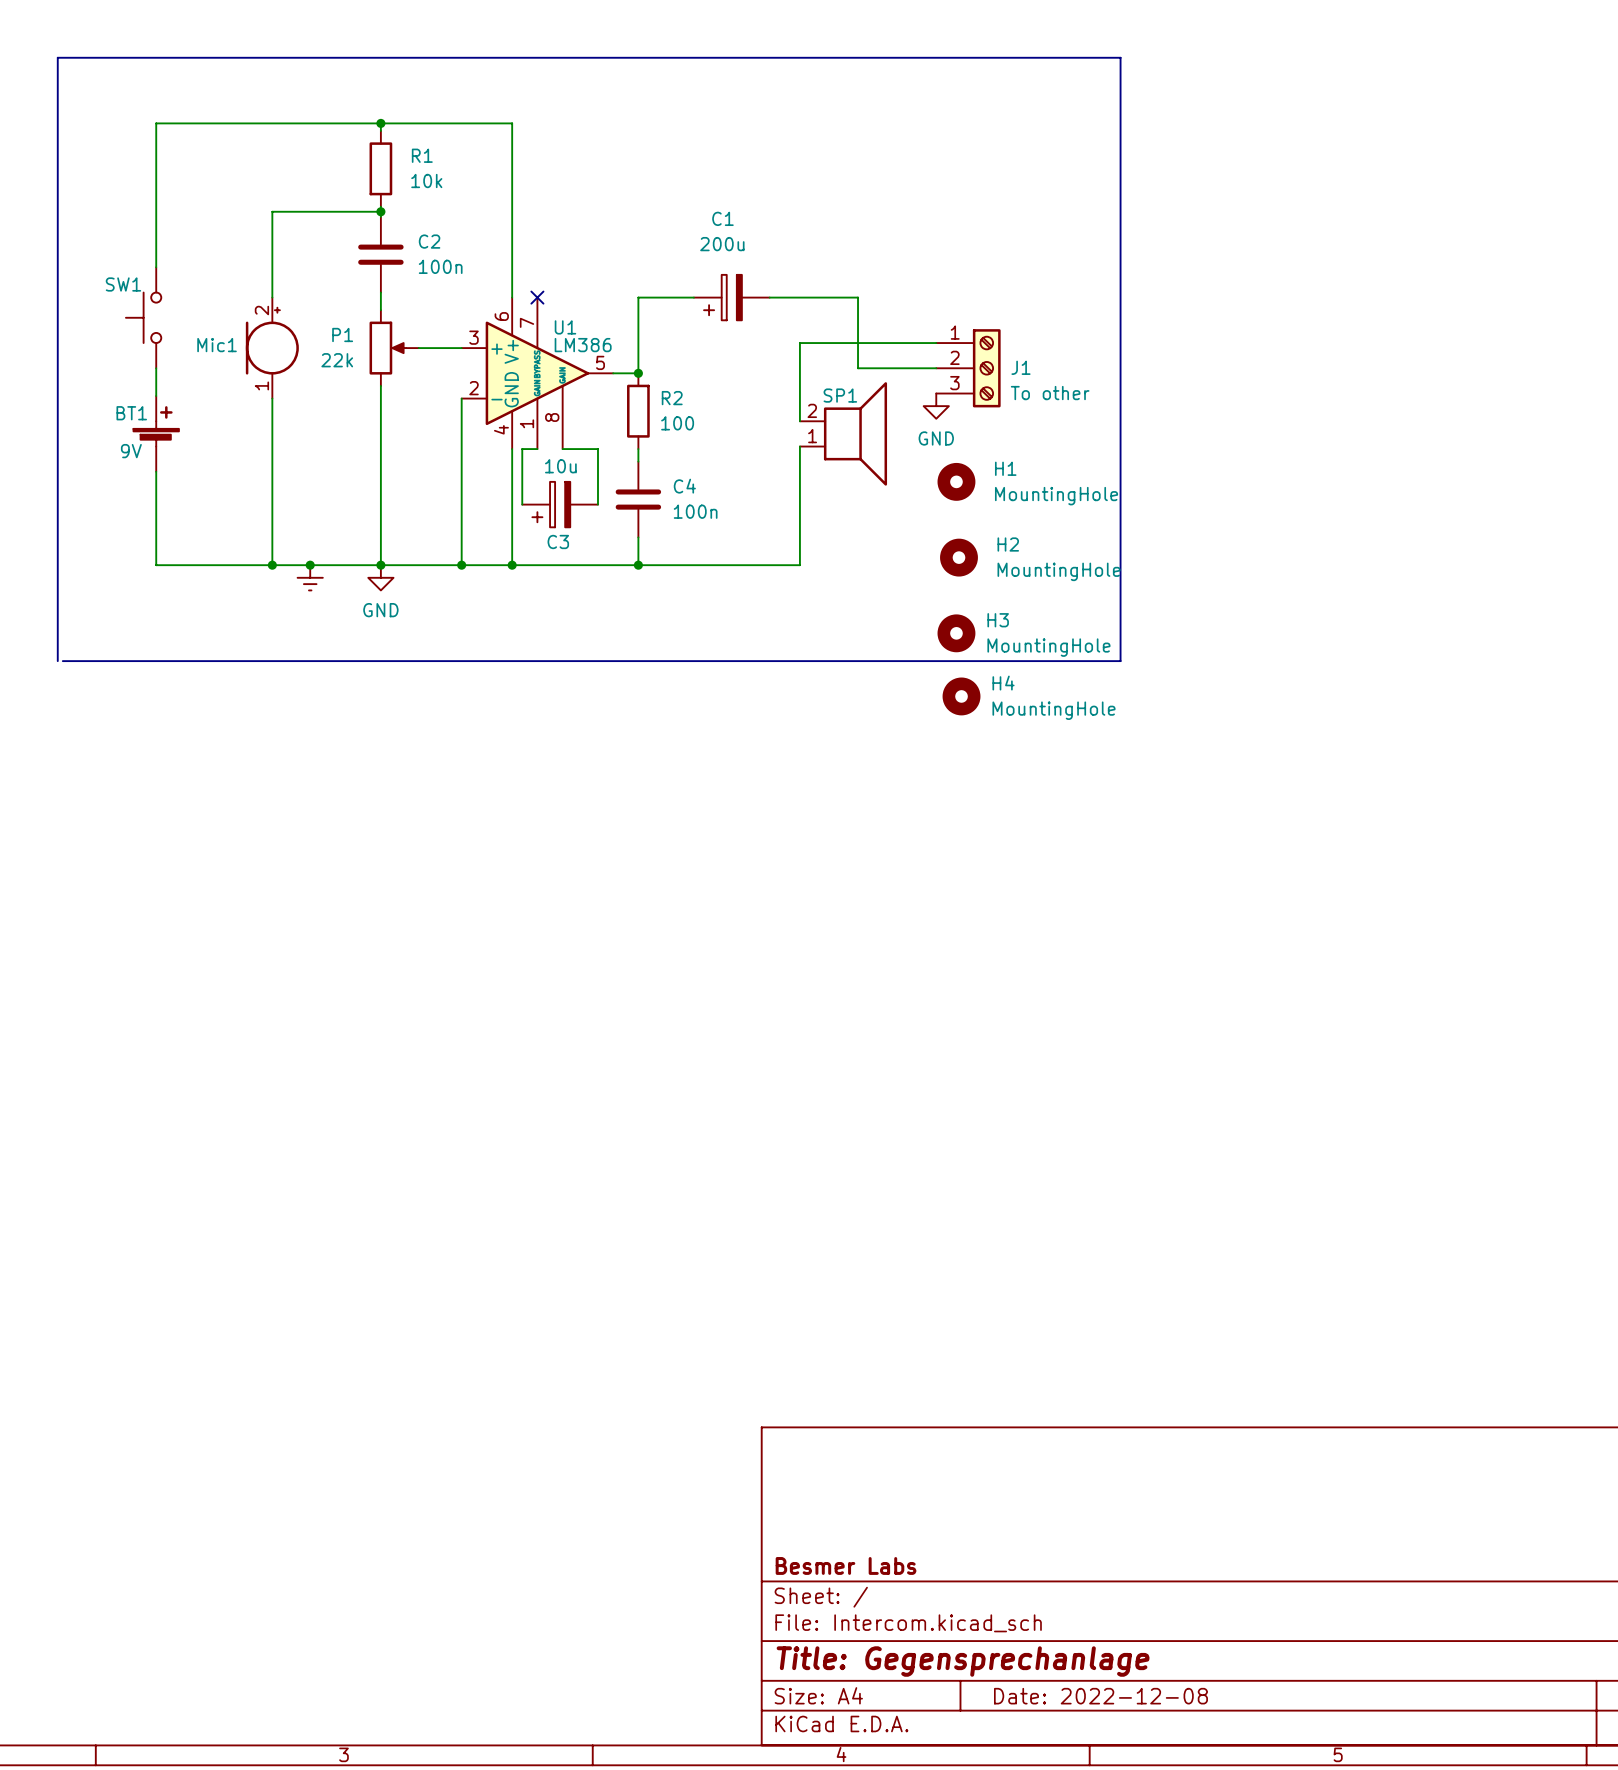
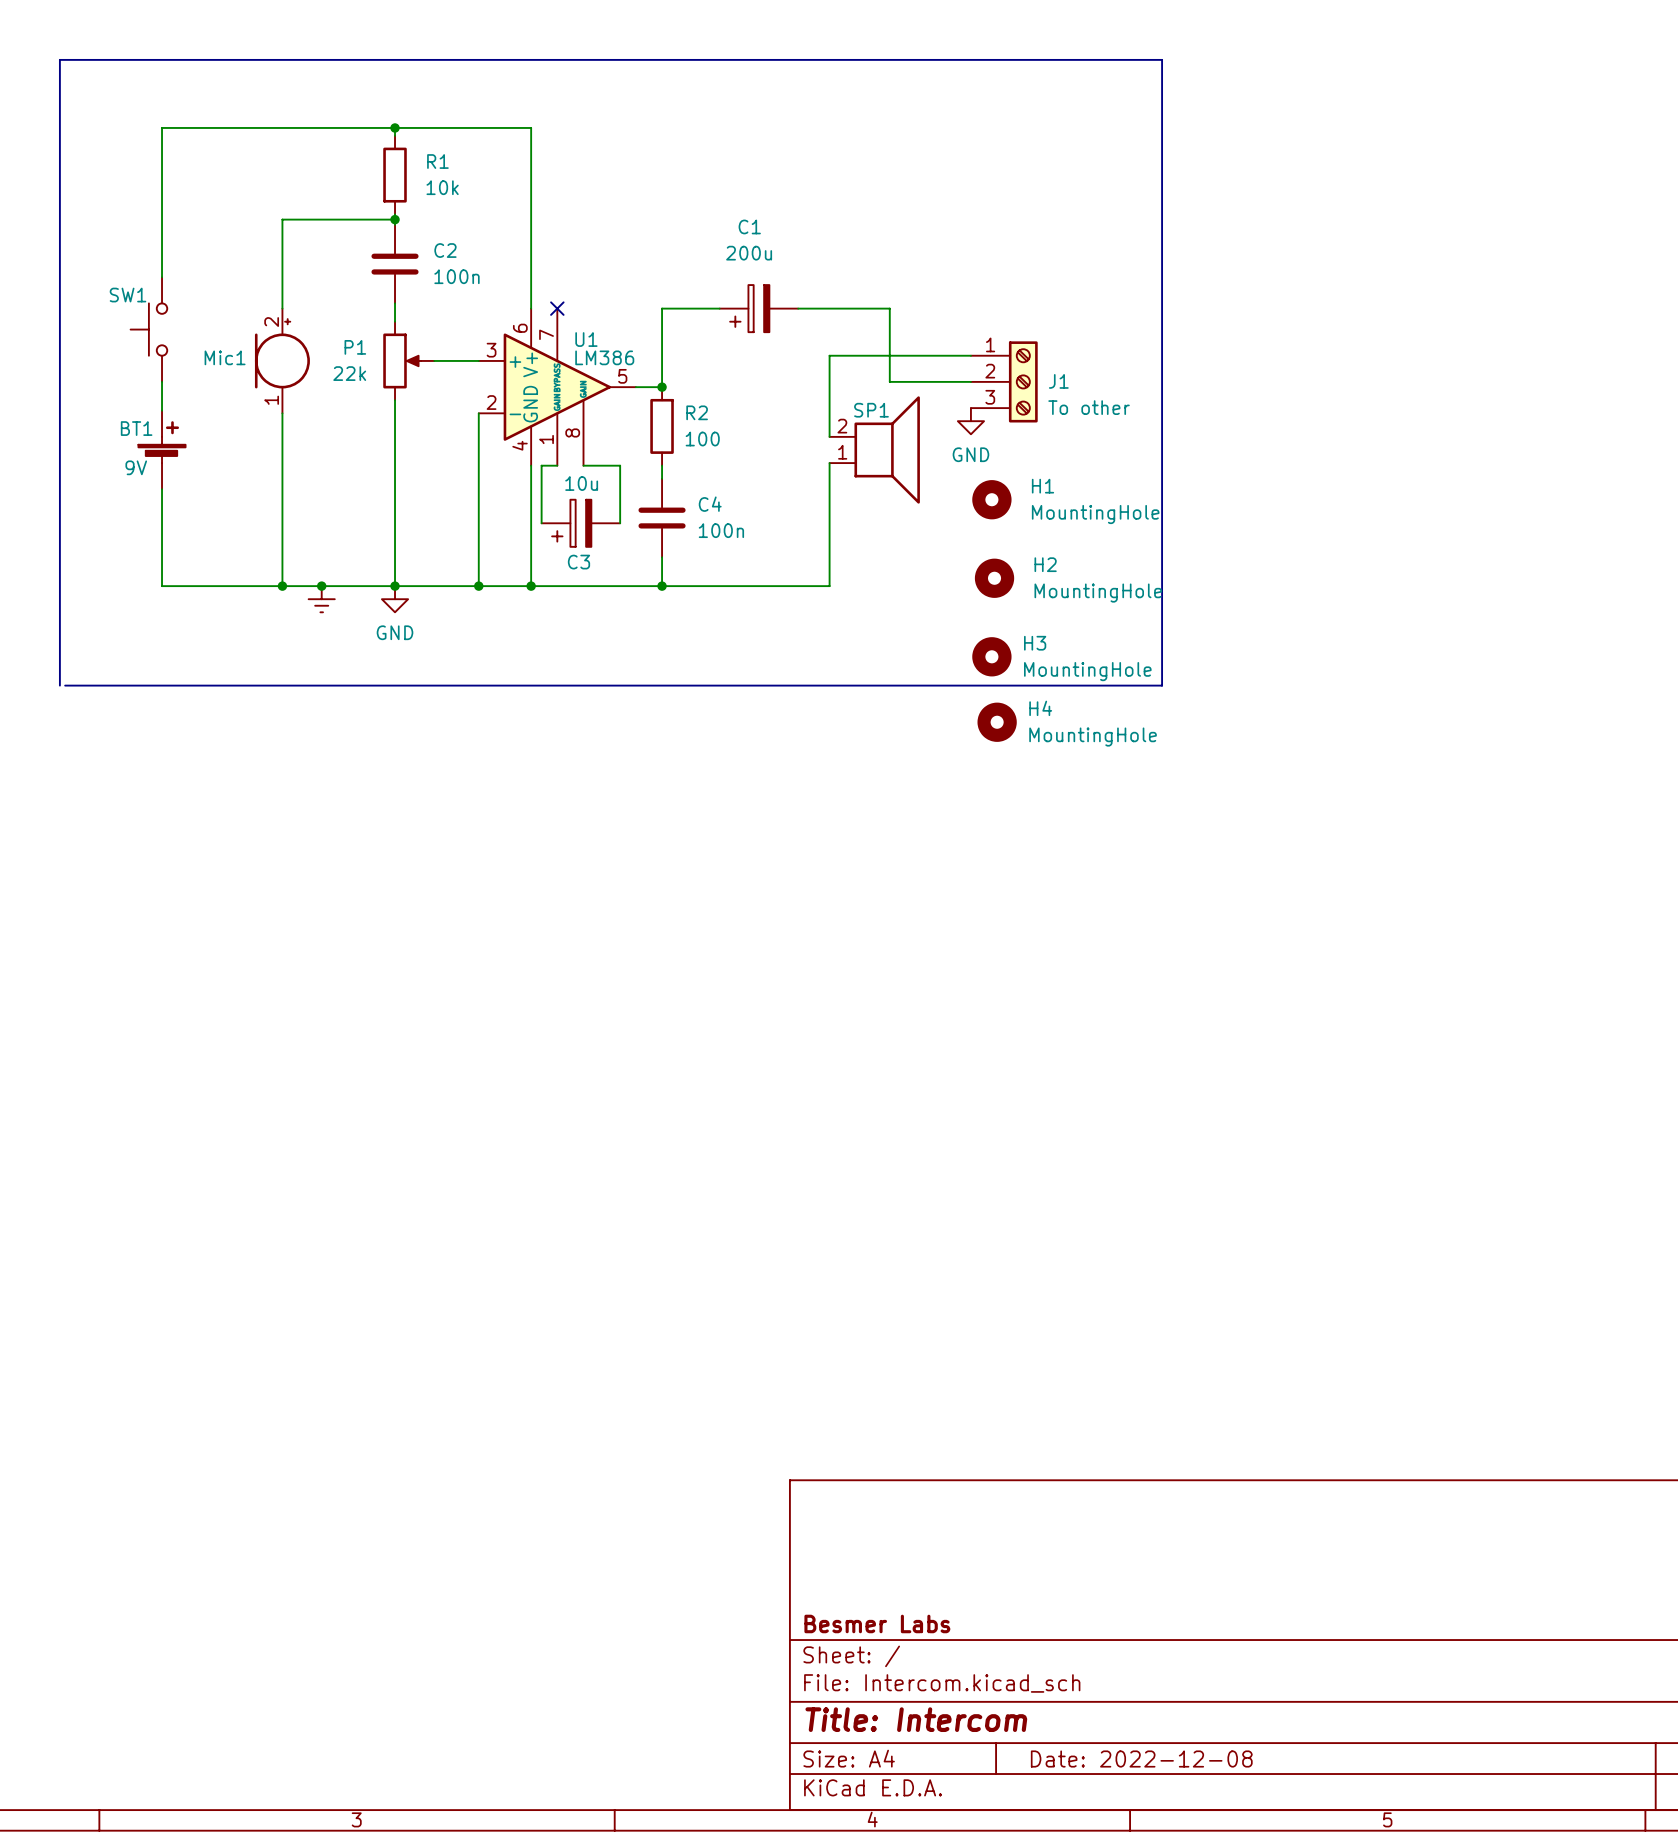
title block: Title: Gegensprechanlage (963, 1661) -> Title: Intercom (916, 1719)

